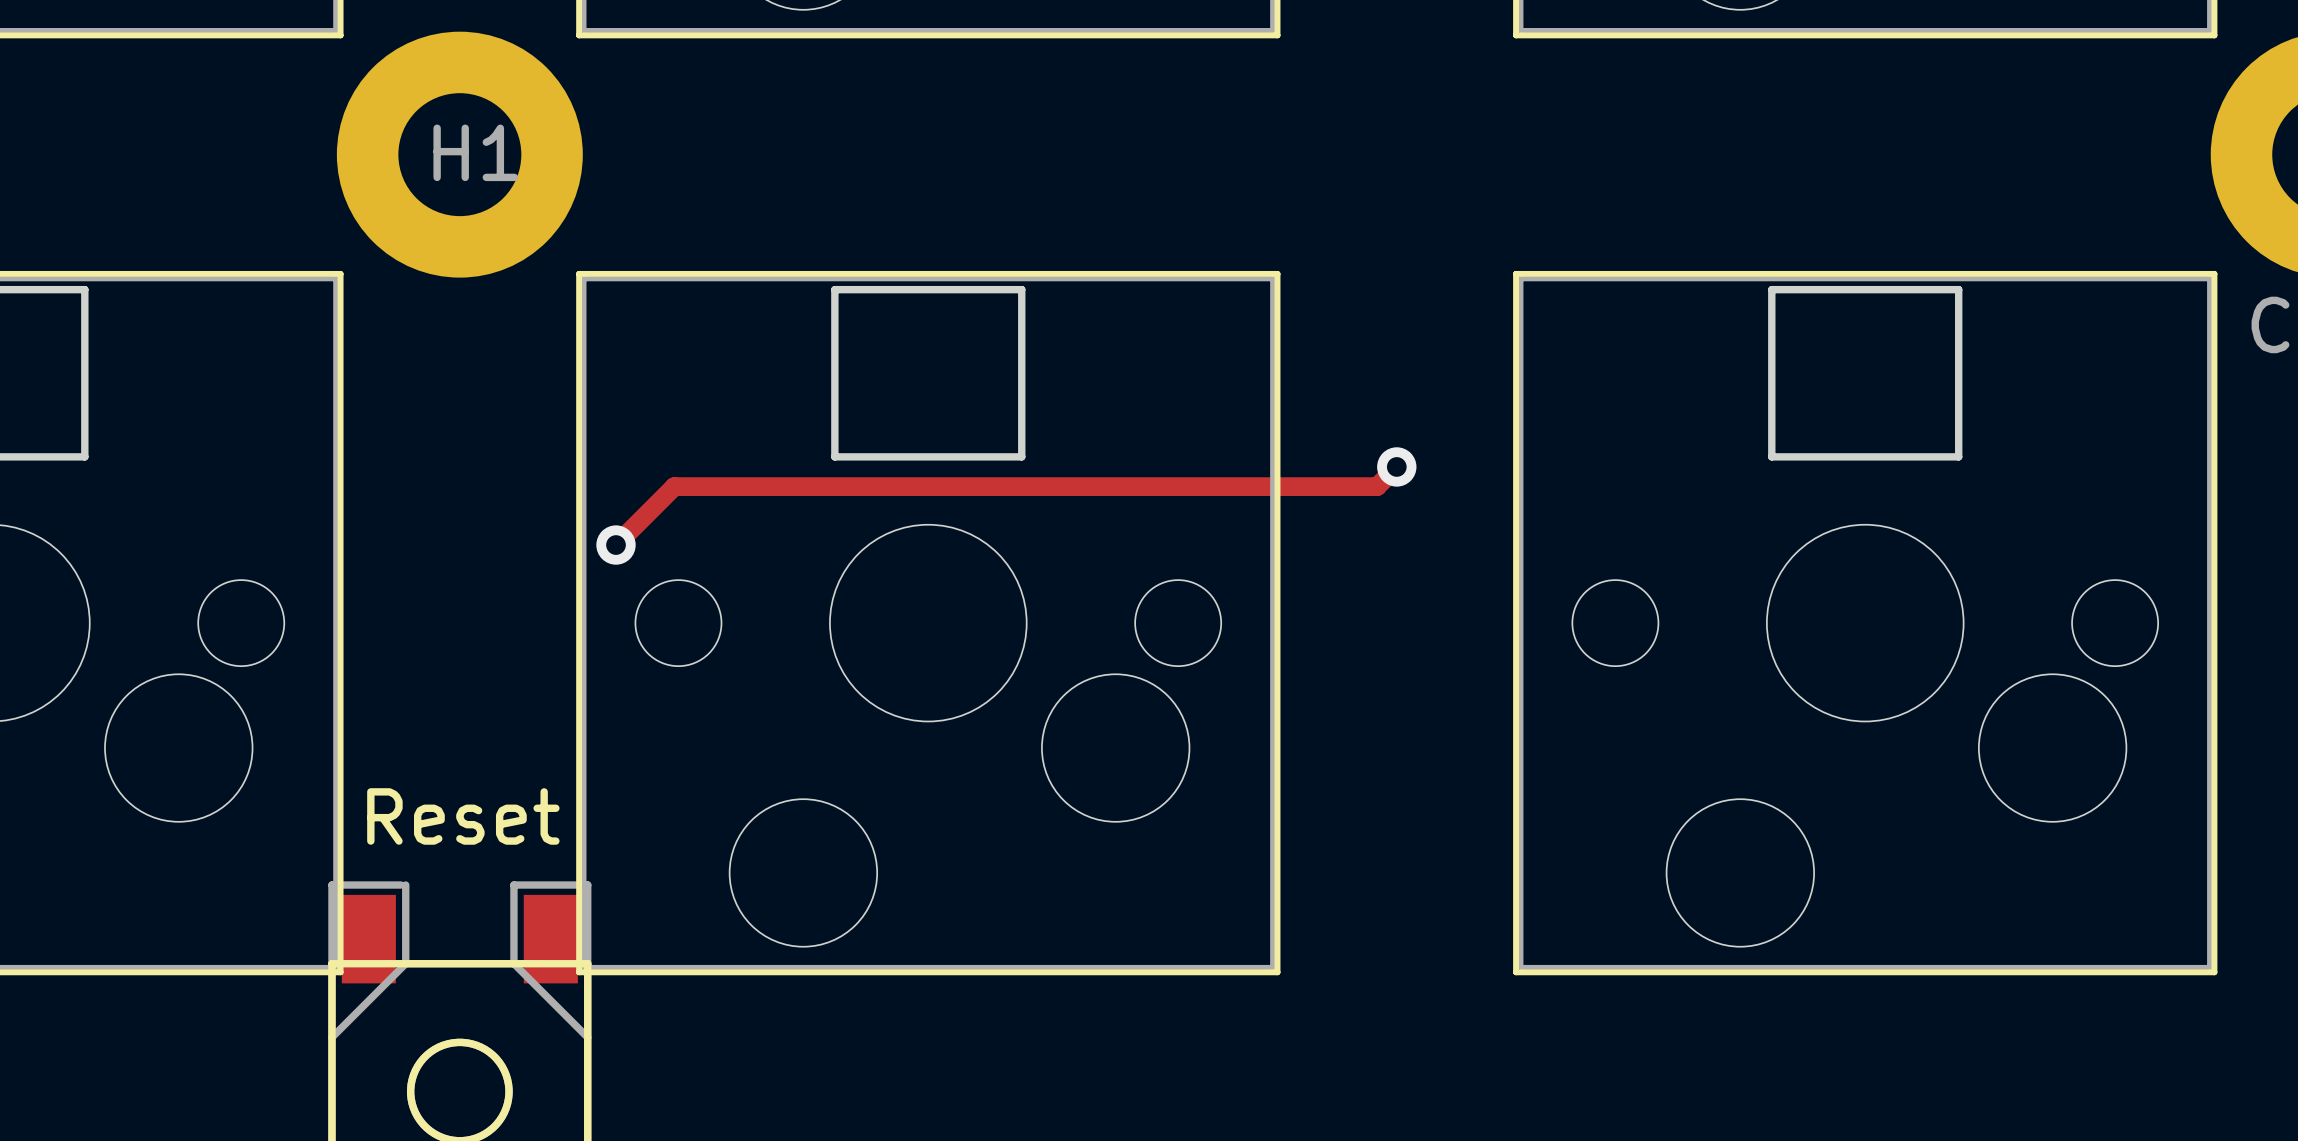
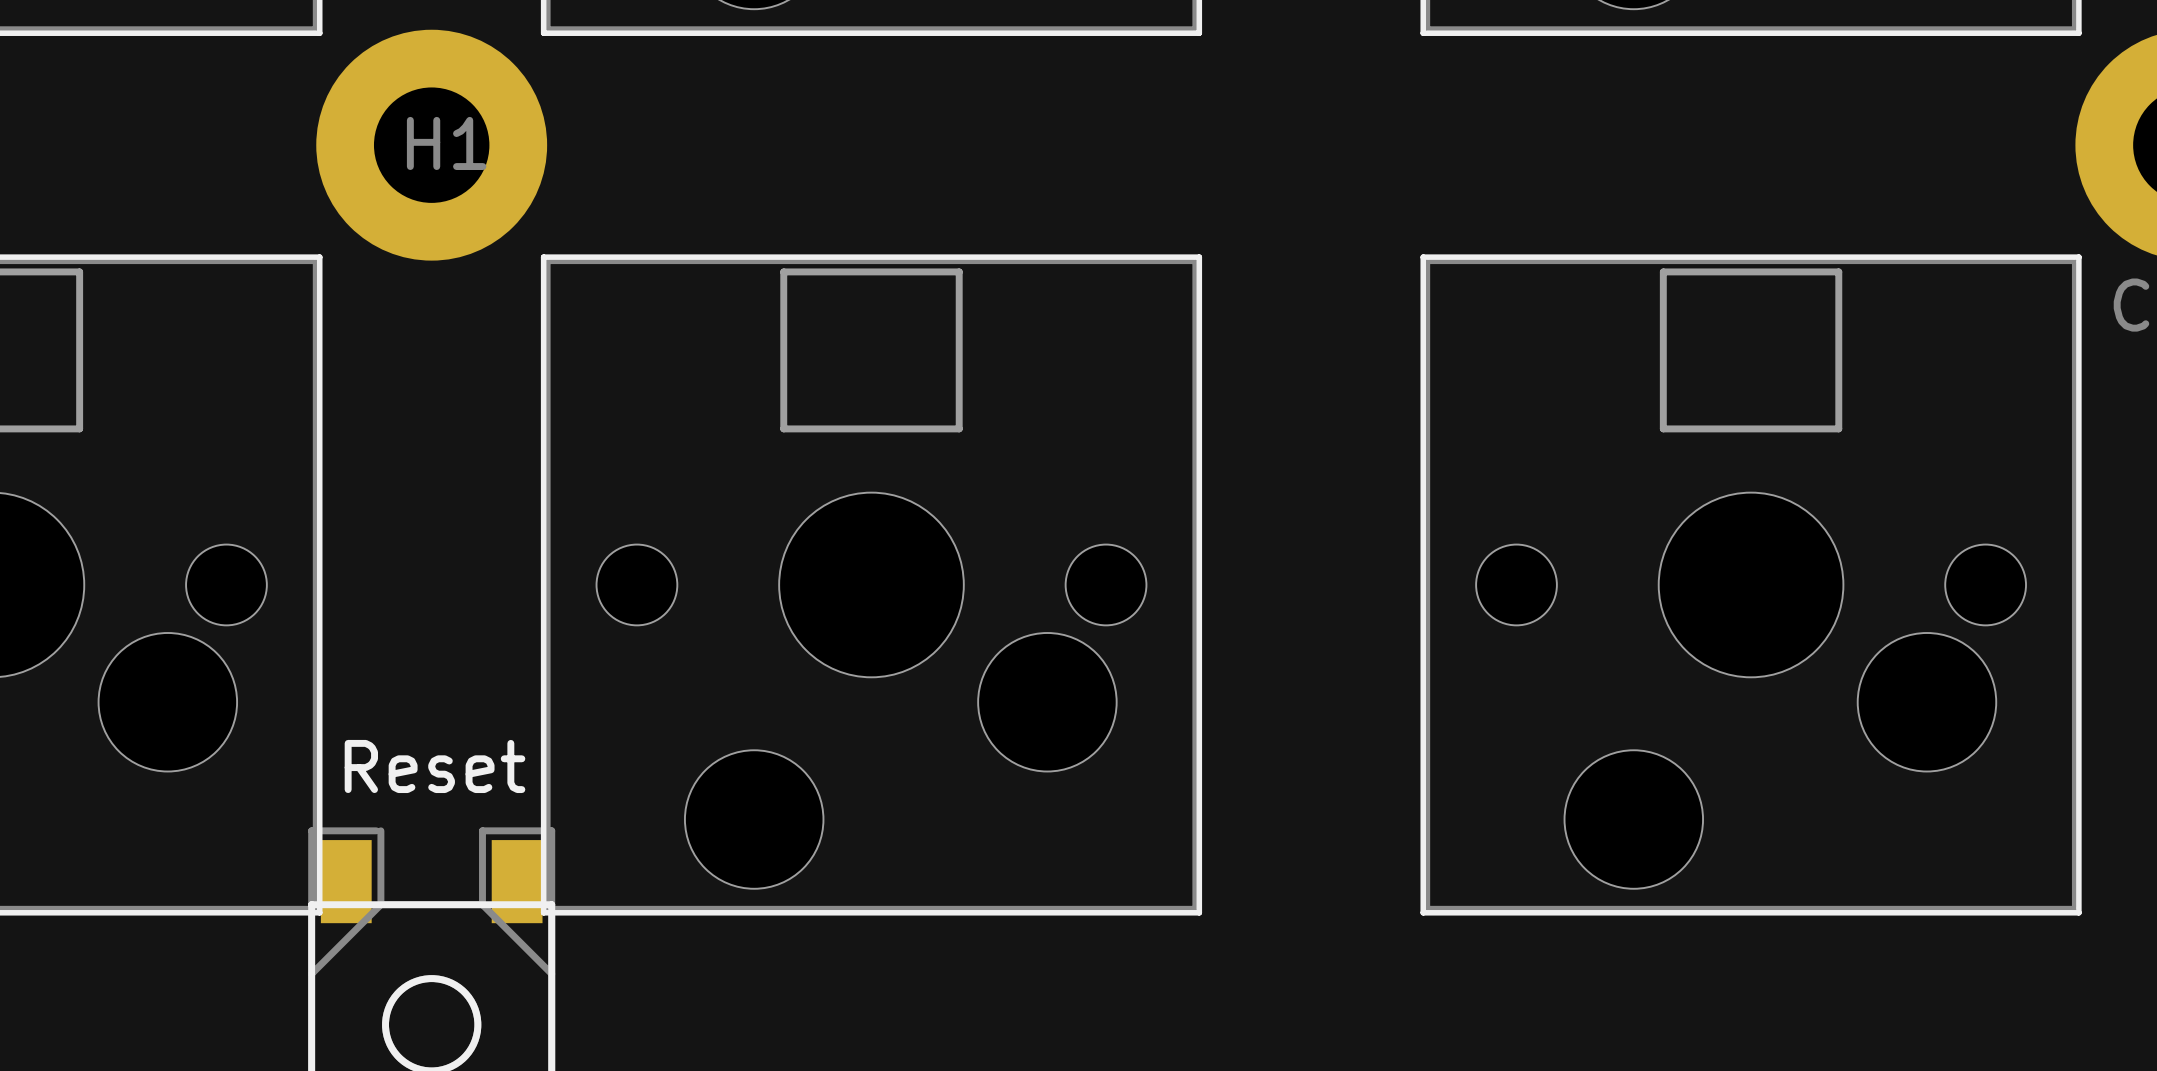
track: (1396, 466) (1377, 486) (674, 486) (616, 545) -> none
via: (1396, 466) -> none
via: (616, 545) -> none

